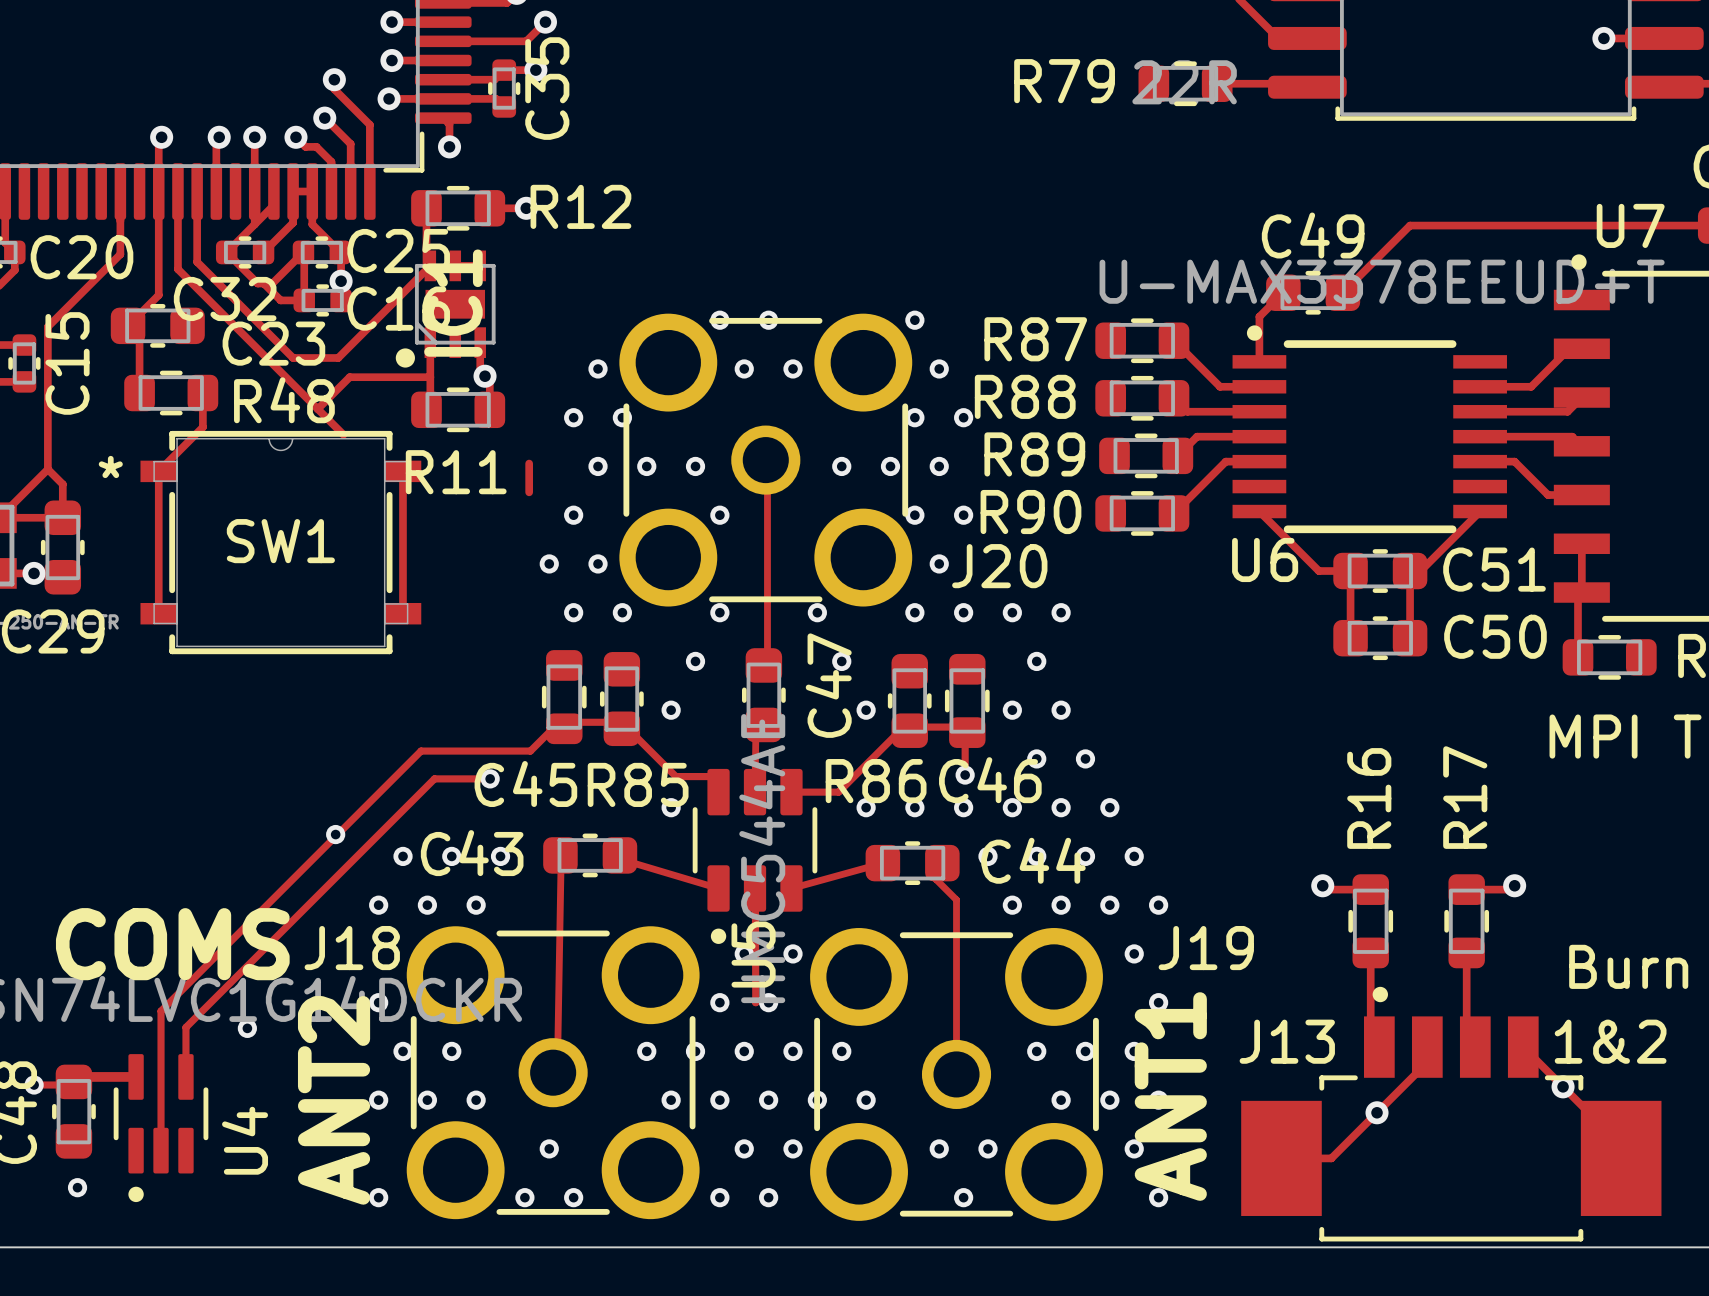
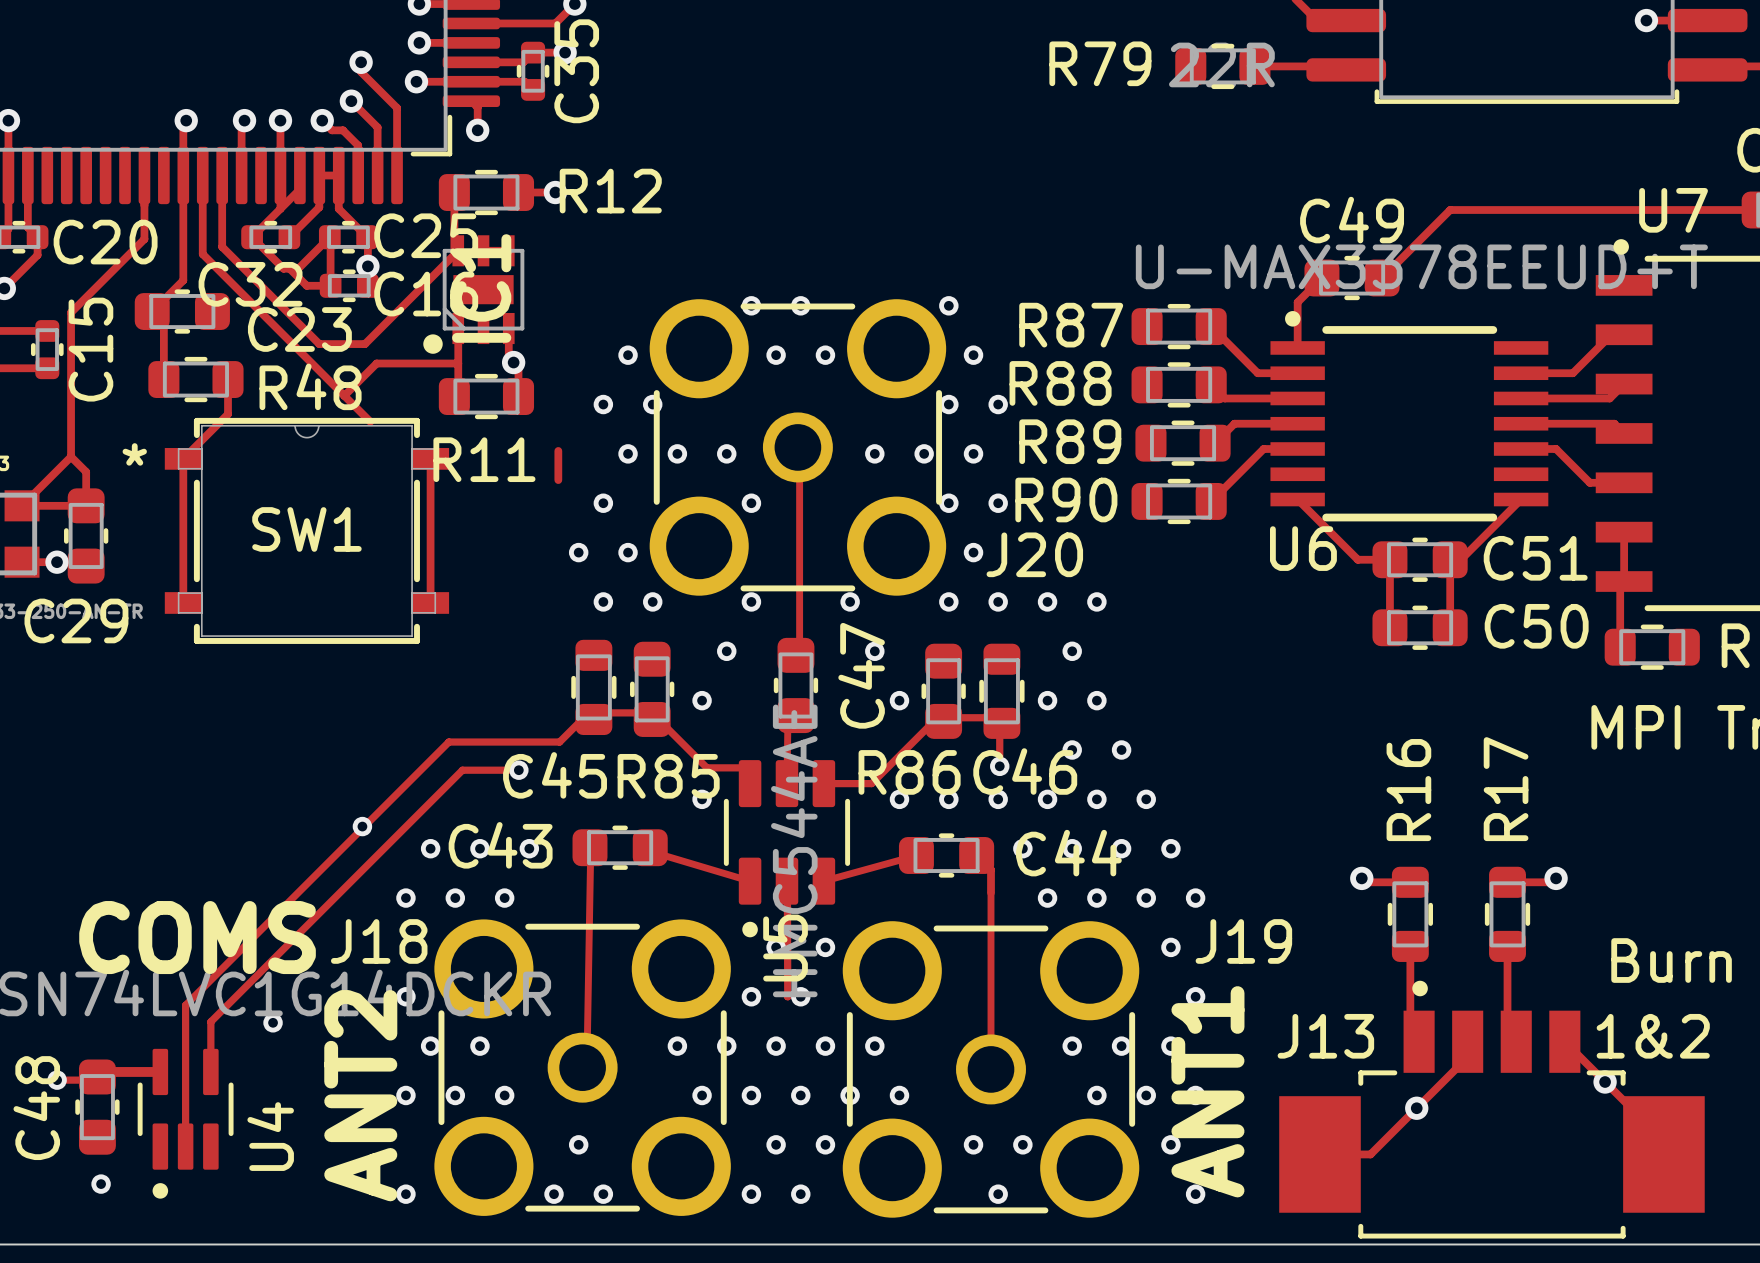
top track: (936, 863) (936, 879) (956, 899) -> (976, 855) (991, 869) (991, 892)

